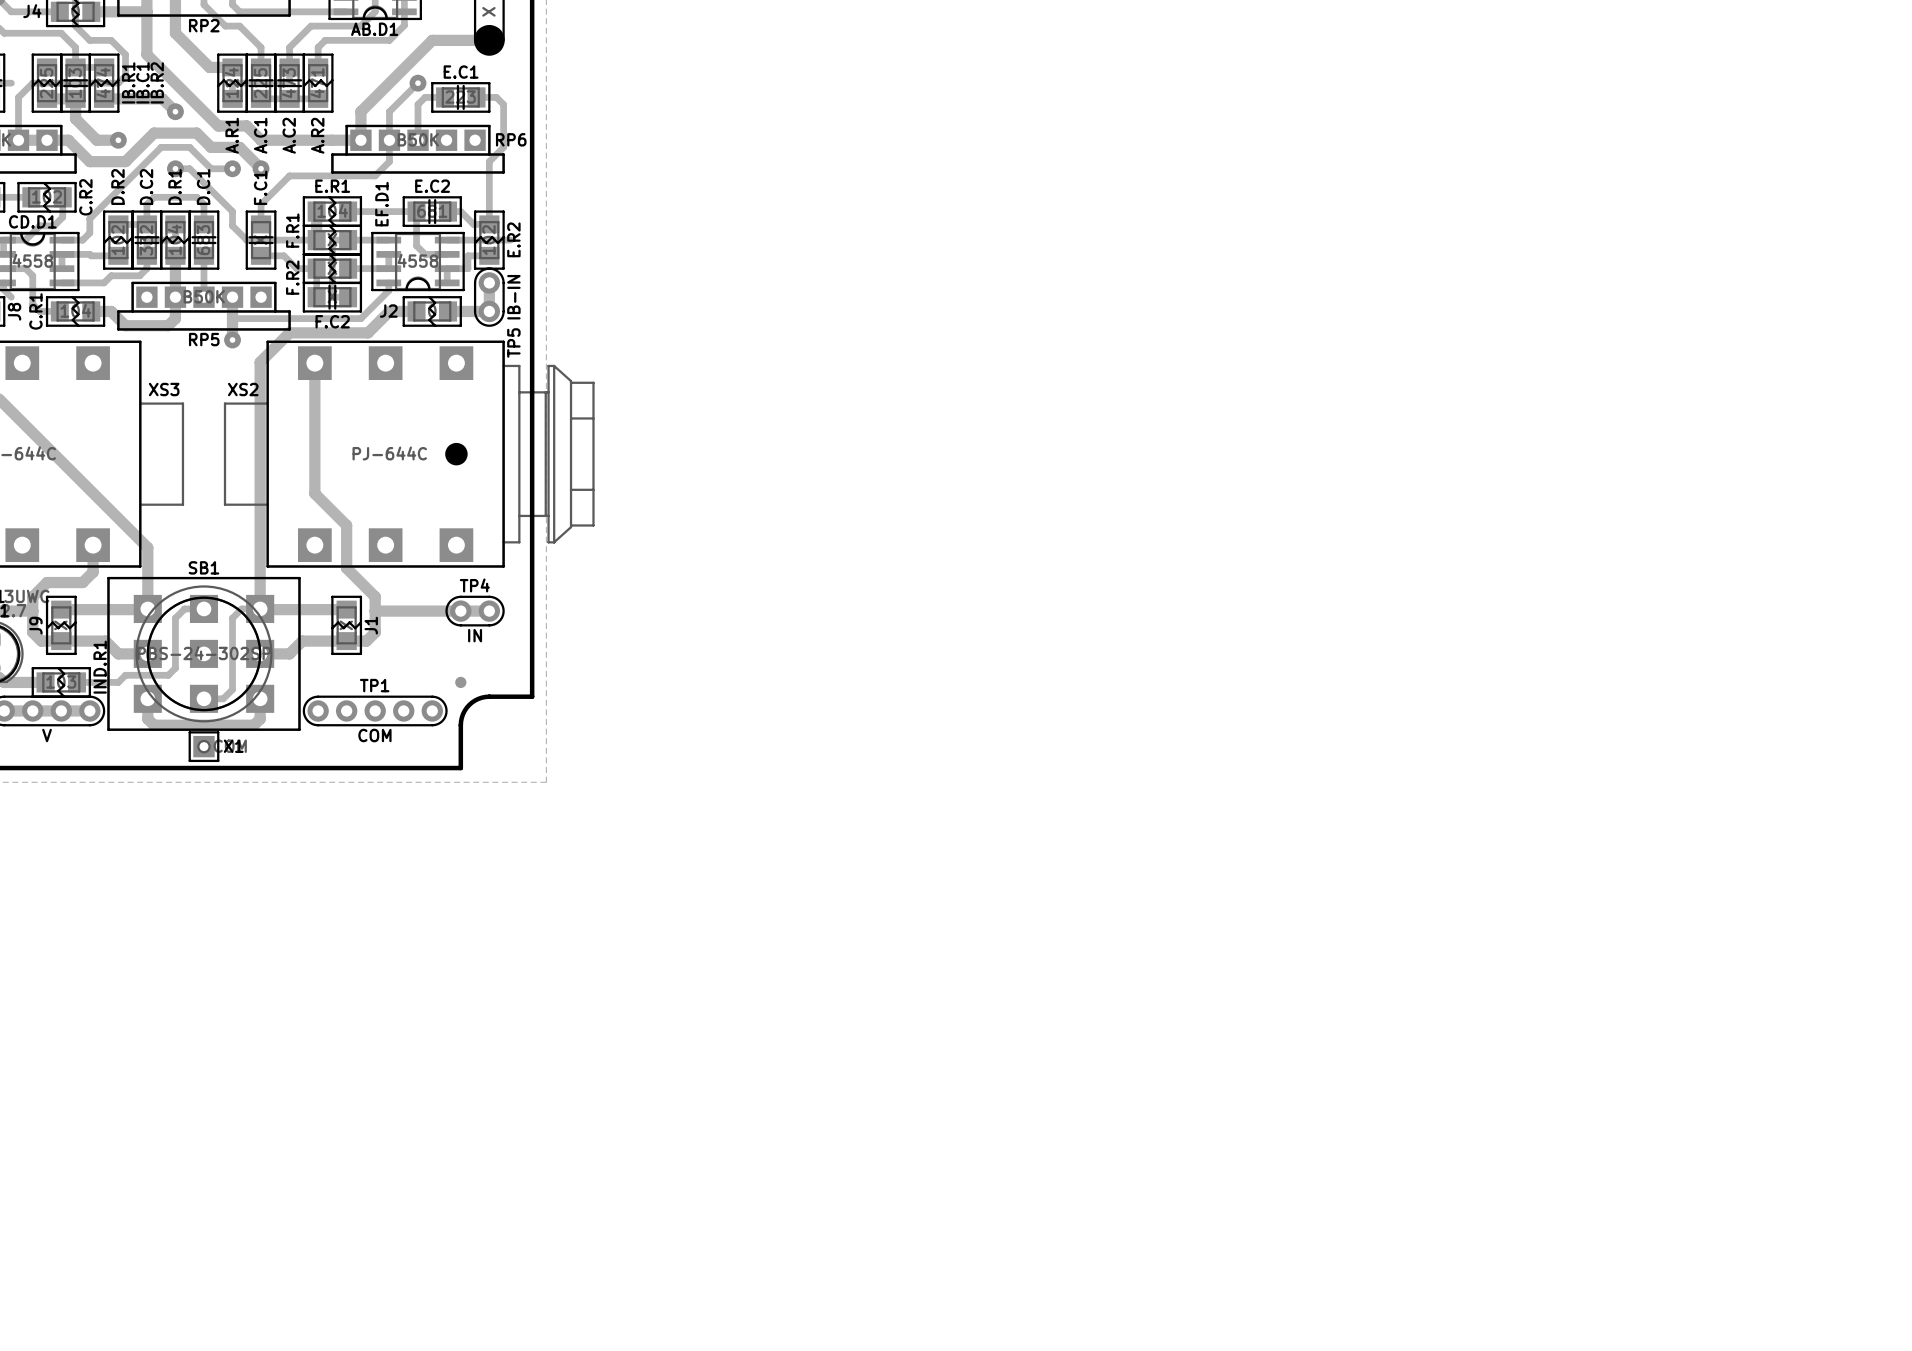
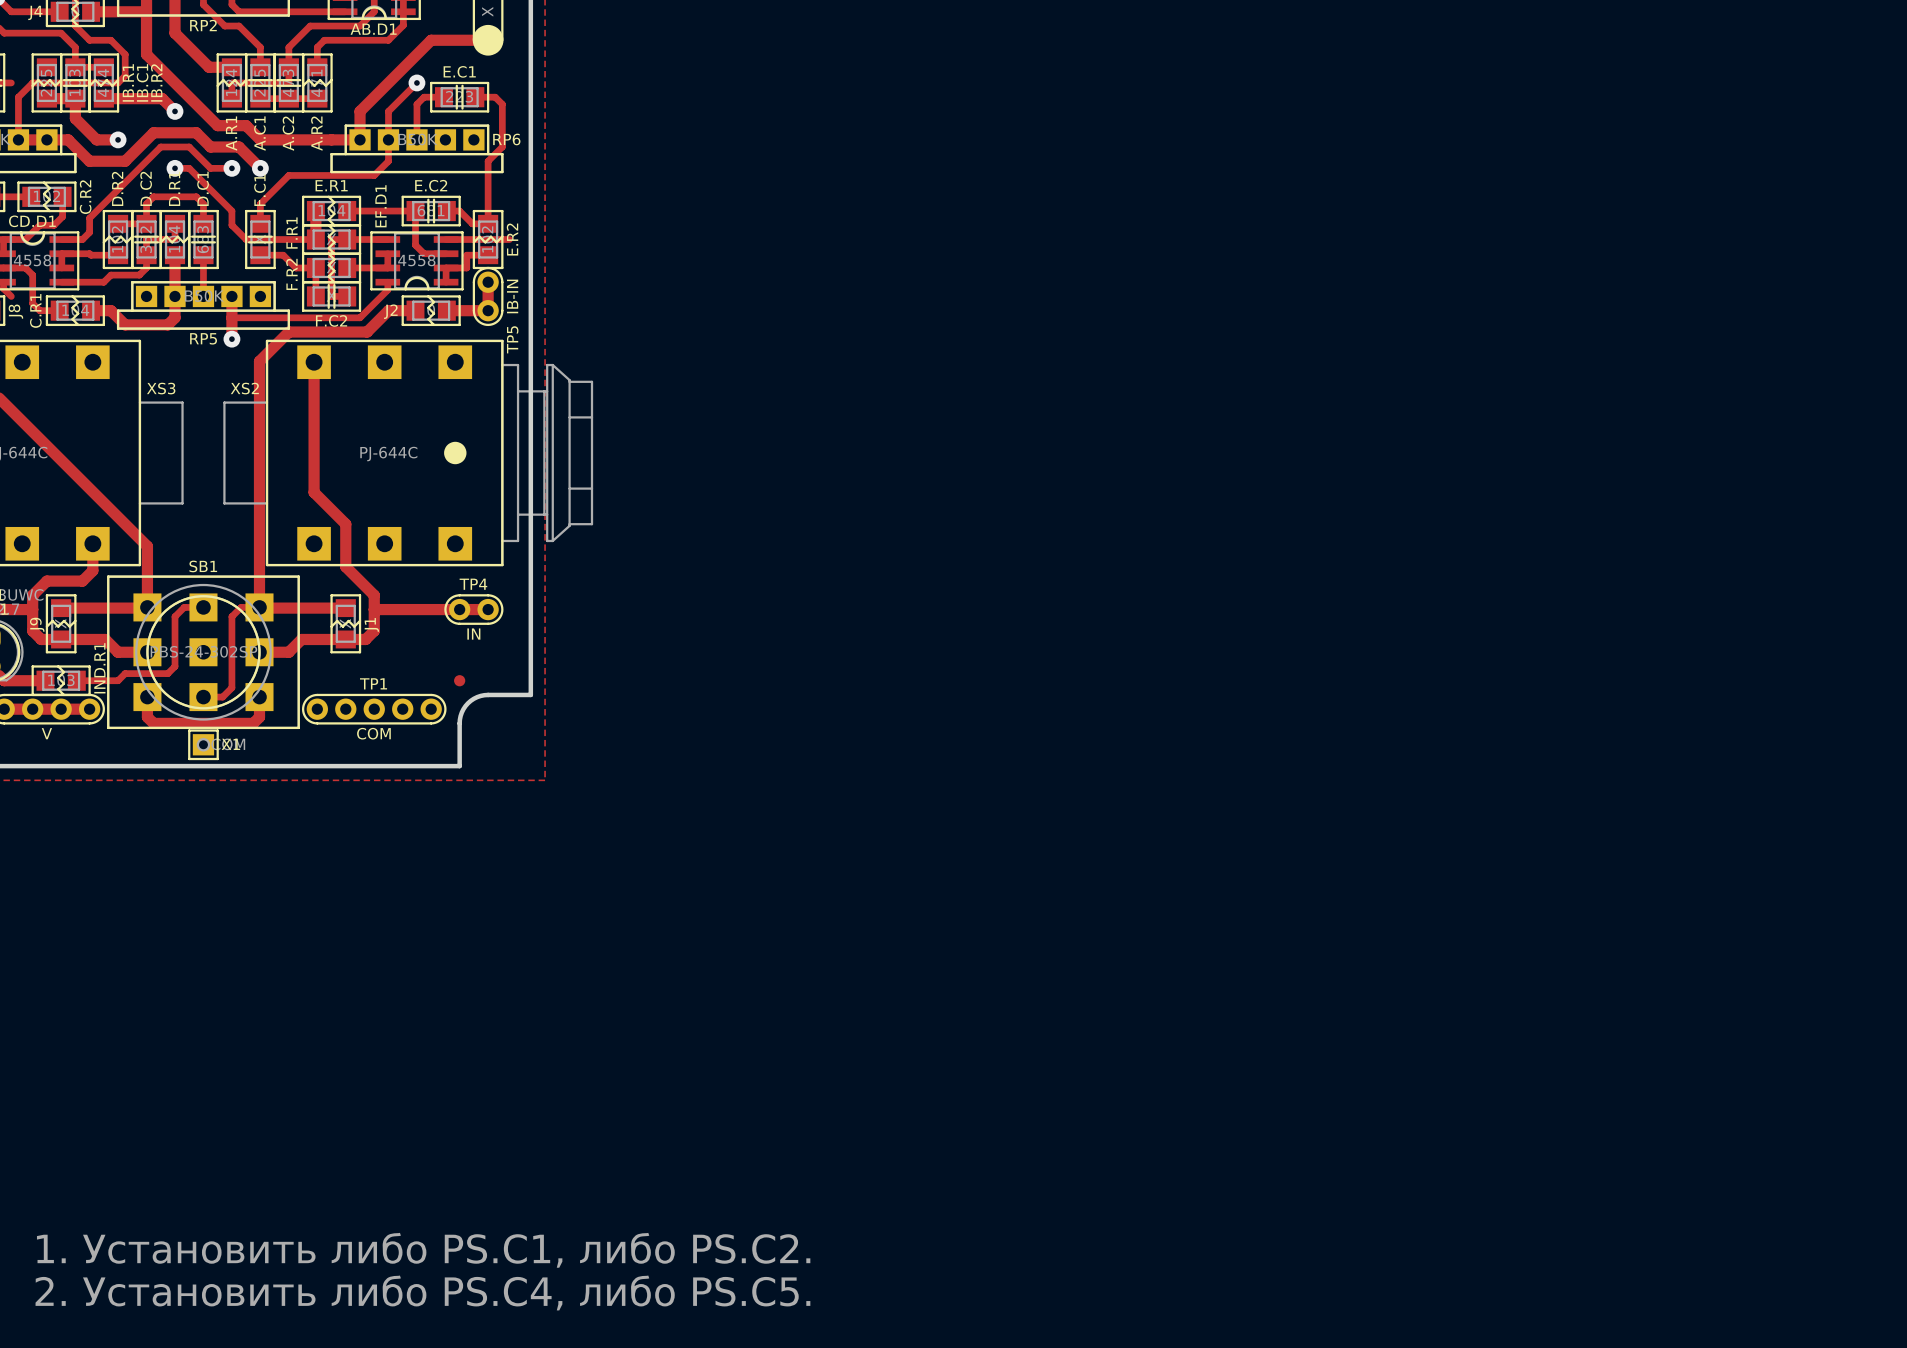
text: none -> 1. Установить либо PS.C1, либо PS.C2. (423, 1250)
text: none -> 2. Установить либо PS.C4, либо PS.C5. (422, 1292)

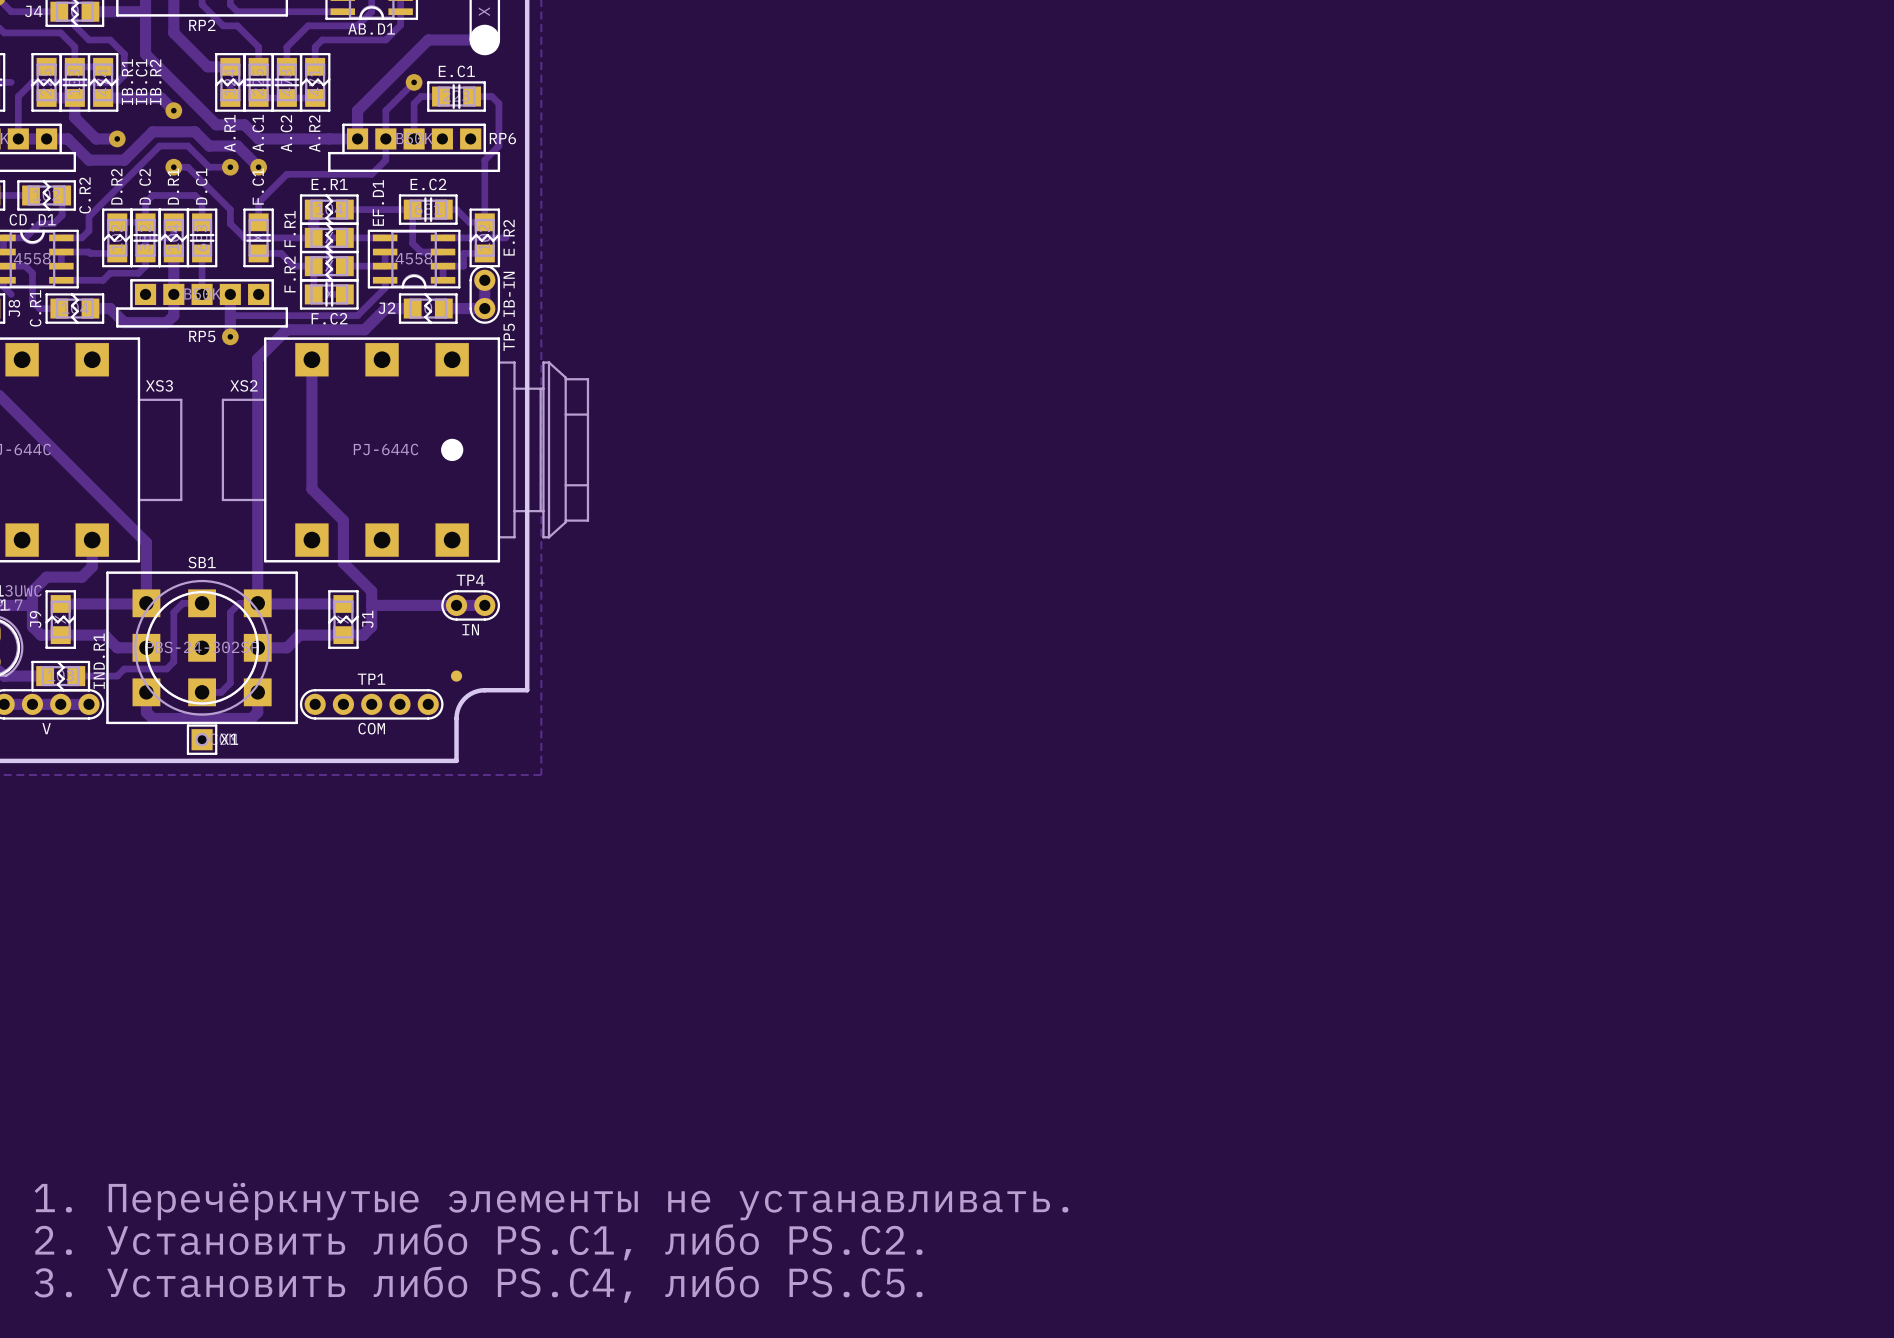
text: none -> 1. Перечёркнутые элементы не устанавливать. (551, 1201)
text: 1. Установить либо PS.C1, либо PS.C2. (423, 1250) -> 2. Установить либо PS.C1, либо PS.C2. (478, 1242)
text: 2. Установить либо PS.C4, либо PS.C5. (422, 1292) -> 3. Установить либо PS.C4, либо PS.C5. (478, 1284)

